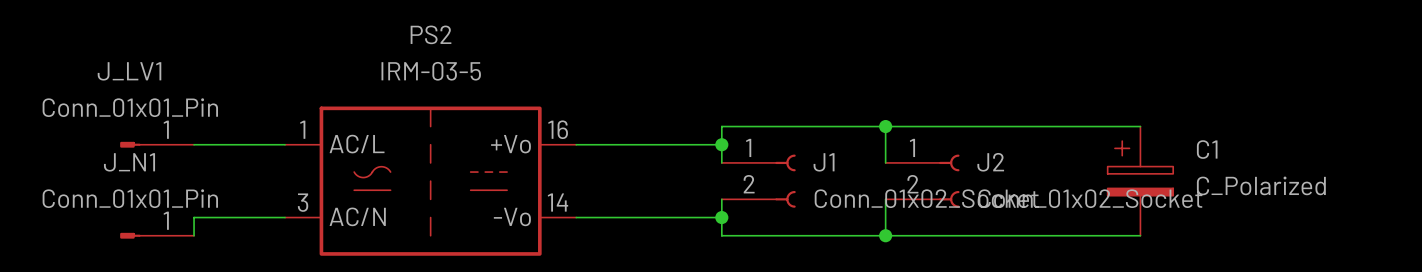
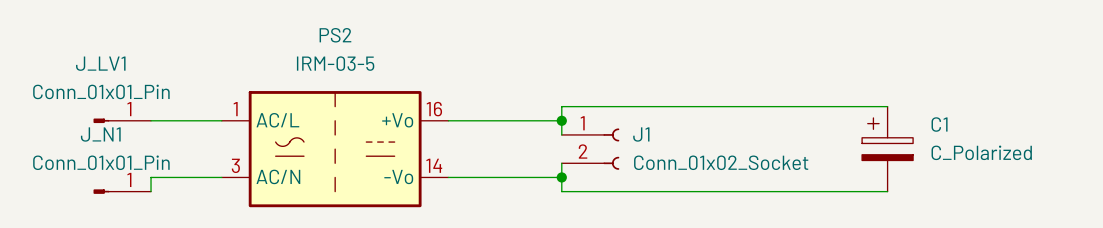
wire: (885, 126) (885, 162) -> none
junction: (885, 126) -> none
J2: Conn_01x02_Socket (922, 181) -> none
wire: (885, 199) (885, 235) -> none
junction: (885, 235) -> none

